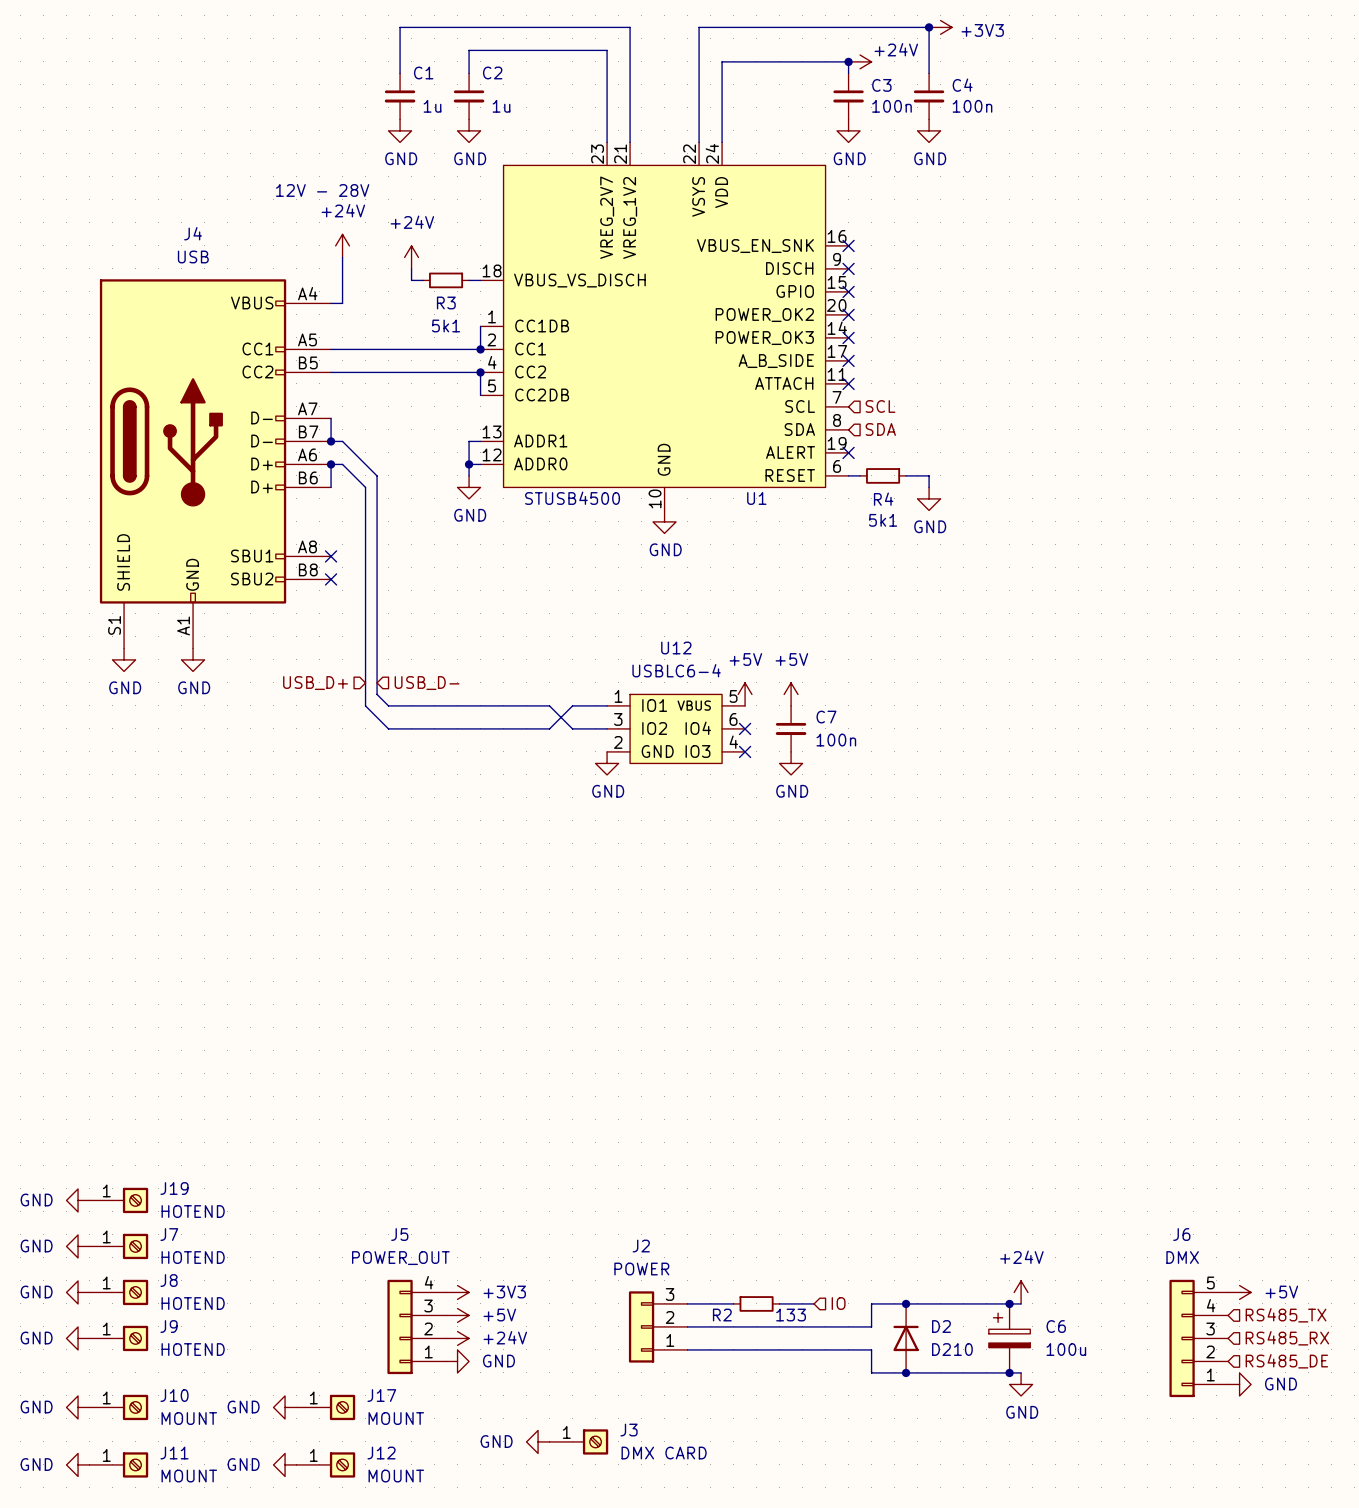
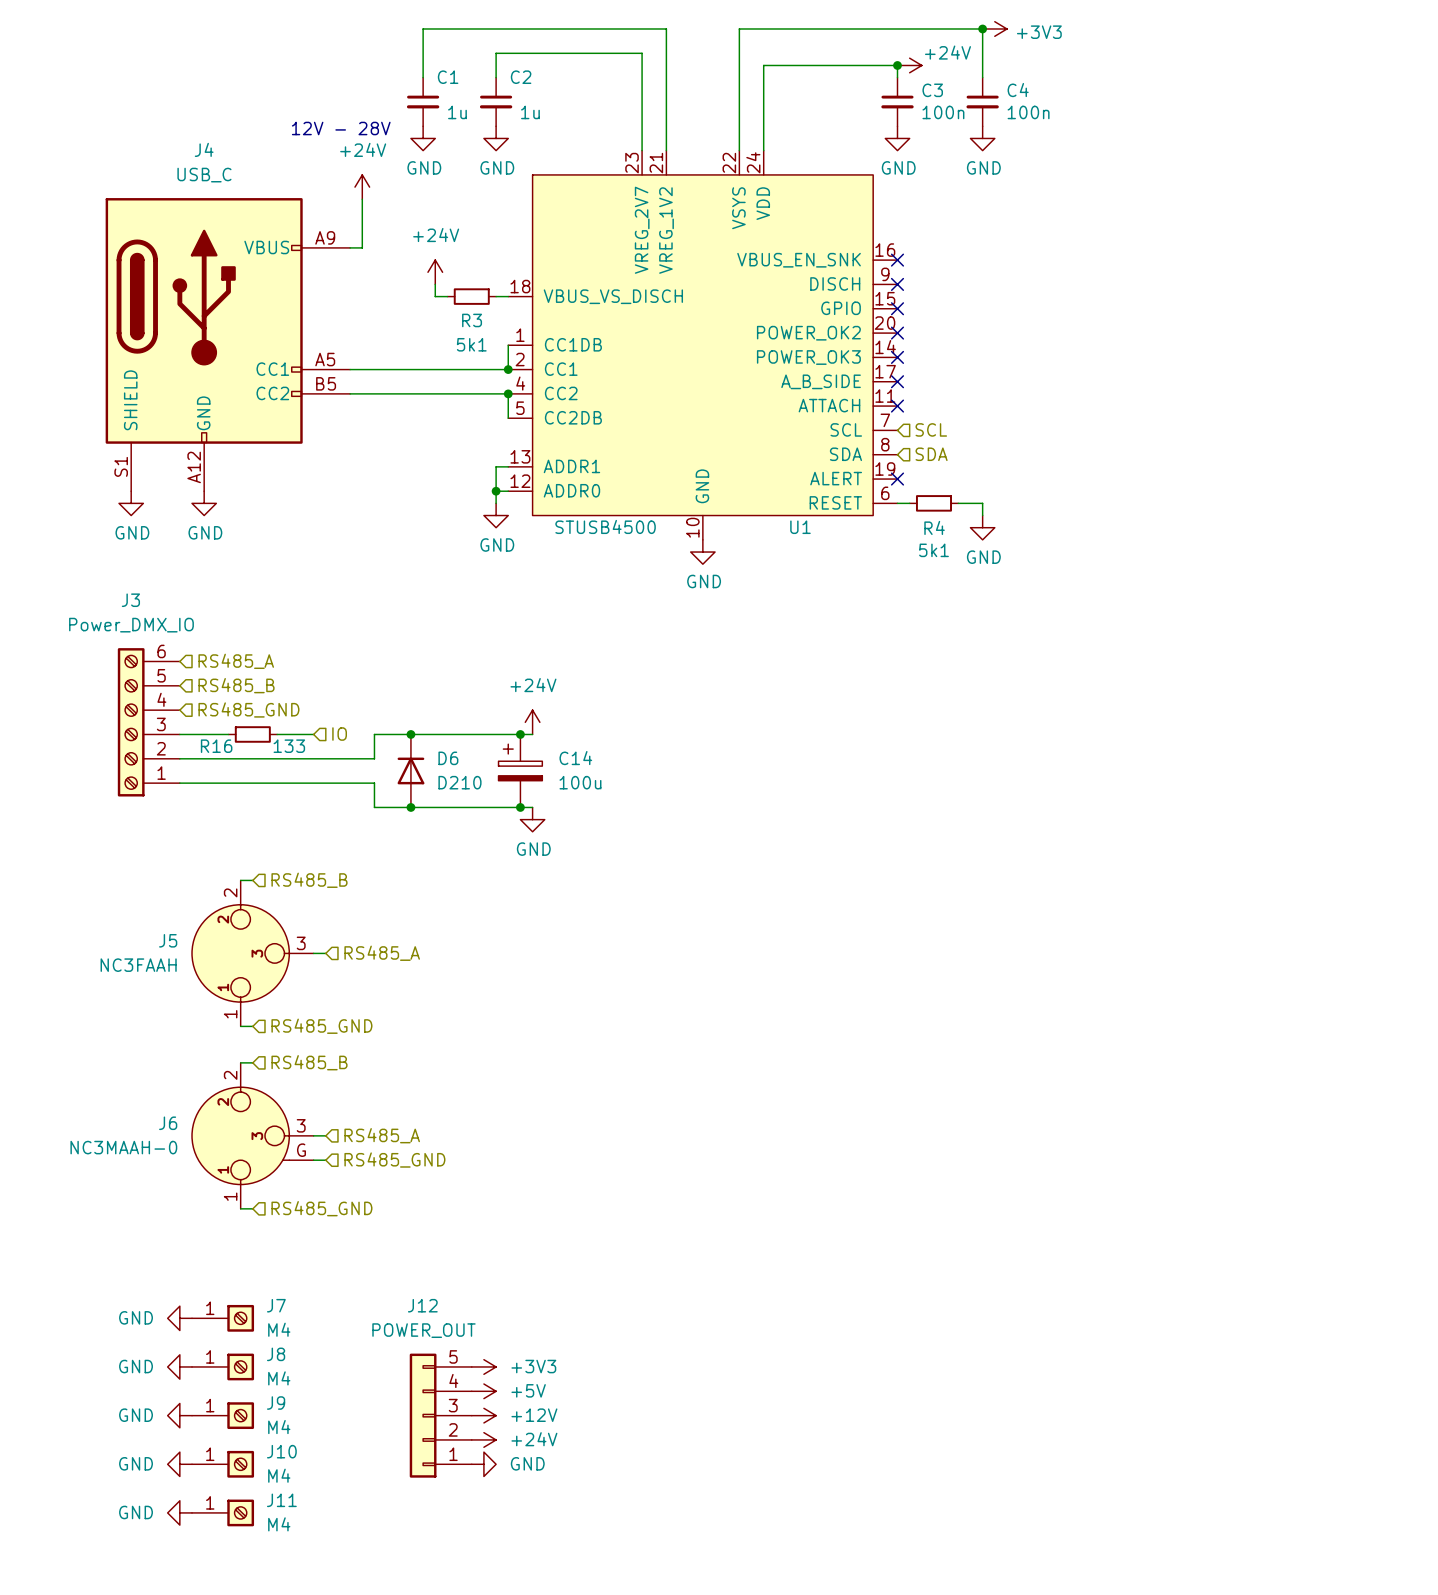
text position: 12V - 28V (322, 190) -> 12V - 28V (341, 128)
J4 name position: J4 (193, 233) -> J4 (204, 149)
power symbol position: +24V (342, 245) -> +24V (362, 187)
J4 value: USB (193, 256) -> USB_C (204, 175)
wire: (342, 257) (342, 303) (331, 303) -> (362, 199) (362, 247) (350, 247)
J4 symbol: [99, 279, 332, 649] -> [105, 198, 351, 492]
wire: (331, 418) (331, 441) (342, 441) (377, 475) (377, 694) (388, 705) (549, 705) (572, 728) (607, 728) -> none
junction: (331, 441) -> none
junction: (331, 464) -> none
power symbol: none -> GND (131, 503)
power symbol: none -> GND (204, 503)
wire: (331, 487) (331, 464) (342, 464) (365, 487) (365, 705) (388, 728) (549, 728) (572, 705) (607, 705) -> none
no-connect mark: (331, 556) -> none
no-connect mark: (331, 579) -> none
hierarchical label: none -> RS485_A (236, 661)
hierarchical label: none -> RS485_B (236, 685)
power symbol: GND (124, 659) -> none
power symbol: GND (193, 659) -> none
hierarchical label: none -> RS485_GND (248, 709)
power symbol: none -> +24V (532, 722)
hierarchical label: USB_D+ (315, 683) -> none
hierarchical label: USB_D- (427, 683) -> none
wire: none -> (179, 734) (228, 734)
R16: none -> 133 (252, 734)
wire: none -> (277, 734) (313, 734)
hierarchical label: none -> IO (339, 734)
junction: none -> (410, 734)
junction: none -> (520, 734)
wire: none -> (532, 734) (374, 734) (374, 758) (179, 758)
power symbol: +5V (745, 694) -> none
power symbol: +5V (791, 694) -> none
D6: none -> D210 (410, 770)
C14: none -> 100u (520, 770)
U12: USBLC6-4 (676, 728) -> none
no-connect mark: (745, 728) -> none
C7: 100n (791, 728) -> none
wire: none -> (179, 783) (374, 783) (374, 807) (532, 807)
no-connect mark: (745, 751) -> none
junction: none -> (410, 807)
junction: none -> (520, 807)
power symbol position: GND (607, 763) -> GND (532, 819)
power symbol: GND (791, 763) -> none
wire: none -> (240, 880) (252, 880)
hierarchical label: none -> RS485_B (309, 880)
wire: none -> (313, 953) (325, 953)
hierarchical label: none -> RS485_A (382, 953)
wire: none -> (240, 1026) (252, 1026)
hierarchical label: none -> RS485_GND (321, 1026)
wire: none -> (240, 1062) (252, 1062)
hierarchical label: none -> RS485_B (309, 1062)
wire: none -> (313, 1135) (325, 1135)
hierarchical label: none -> RS485_A (382, 1135)
wire: none -> (313, 1160) (325, 1160)
hierarchical label: none -> RS485_GND (394, 1160)
wire: none -> (240, 1208) (252, 1208)
hierarchical label: none -> RS485_GND (321, 1208)
power symbol: GND (78, 1200) -> none
J19: HOTEND (118, 1200) -> none
J5 name position: J5 (399, 1234) -> J5 (168, 940)
J6 name position: J6 (1181, 1234) -> J6 (168, 1123)
power symbol: GND (78, 1246) -> none
J7 position: (118, 1246) -> (223, 1318)
power symbol: none -> GND (179, 1318)
J7 value: HOTEND (193, 1257) -> M4 (279, 1329)
J6 value: DMX (1182, 1257) -> NC3MAAH-0 (123, 1147)
J5 value: POWER_OUT (400, 1258) -> NC3FAAH (138, 965)
J5 symbol: [387, 1279, 447, 1375] -> [192, 880, 314, 1027]
J6 symbol: [1169, 1279, 1229, 1398] -> [192, 1062, 314, 1209]
power symbol: GND (78, 1292) -> none
J8 position: (118, 1292) -> (223, 1366)
power symbol: none -> GND (179, 1366)
power symbol: +24V (1021, 1292) -> none
power symbol: +5V (1239, 1292) -> none
J8 value: HOTEND (193, 1303) -> M4 (279, 1378)
wire: (687, 1303) (733, 1303) -> none
R2: 133 (756, 1303) -> none
wire: (779, 1303) (814, 1303) -> none
hierarchical label: IO (838, 1303) -> none
junction: (906, 1303) -> none
junction: (1009, 1303) -> none
wire: (1021, 1303) (871, 1303) (871, 1326) (687, 1326) -> none
hierarchical label: RS485_TX (1286, 1315) -> none
J2: POWER (658, 1326) -> none
power symbol: GND (78, 1338) -> none
J9 position: (118, 1338) -> (223, 1415)
power symbol: none -> GND (179, 1415)
power symbol: +24V (457, 1338) -> +12V (483, 1415)
D2: D210 (906, 1338) -> none
C6: 100u (1009, 1338) -> none
hierarchical label: RS485_RX (1287, 1338) -> none
J9 value: HOTEND (193, 1349) -> M4 (279, 1427)
wire: (687, 1349) (871, 1349) (871, 1372) (1021, 1372) -> none
power symbol: GND (457, 1361) -> +24V (483, 1439)
hierarchical label: RS485_DE (1286, 1361) -> none
junction: (906, 1372) -> none
junction: (1009, 1372) -> none
power symbol: none -> GND (179, 1464)
power symbol: none -> GND (483, 1464)
power symbol: GND (1021, 1384) -> none
power symbol: GND (1239, 1384) -> none
power symbol: GND (78, 1407) -> none
J10 position: (118, 1407) -> (223, 1464)
power symbol: GND (285, 1407) -> none
J17: MOUNT (325, 1407) -> none
J10 value: MOUNT (189, 1418) -> M4 (279, 1475)
J3 symbol: [549, 1429, 609, 1455] -> [117, 648, 180, 797]
power symbol: none -> GND (179, 1512)
J3 name position: J3 (629, 1430) -> J3 (130, 600)
power symbol: GND (538, 1441) -> none
J12 symbol: [296, 1452, 356, 1478] -> [409, 1353, 472, 1478]
J12 name position: J12 (381, 1453) -> J12 (422, 1305)
J3 value: DMX CARD (664, 1453) -> Power_DMX_IO (131, 625)
power symbol: GND (78, 1464) -> none
J11 position: (118, 1464) -> (223, 1512)
power symbol: GND (285, 1464) -> none
J11 value: MOUNT (189, 1476) -> M4 (279, 1524)
J12 value: MOUNT (396, 1476) -> POWER_OUT (423, 1330)

